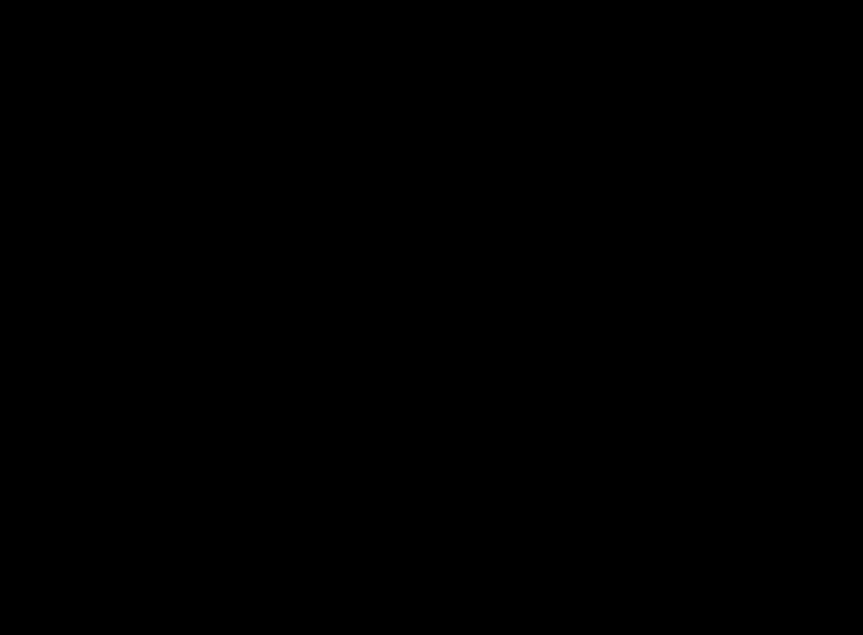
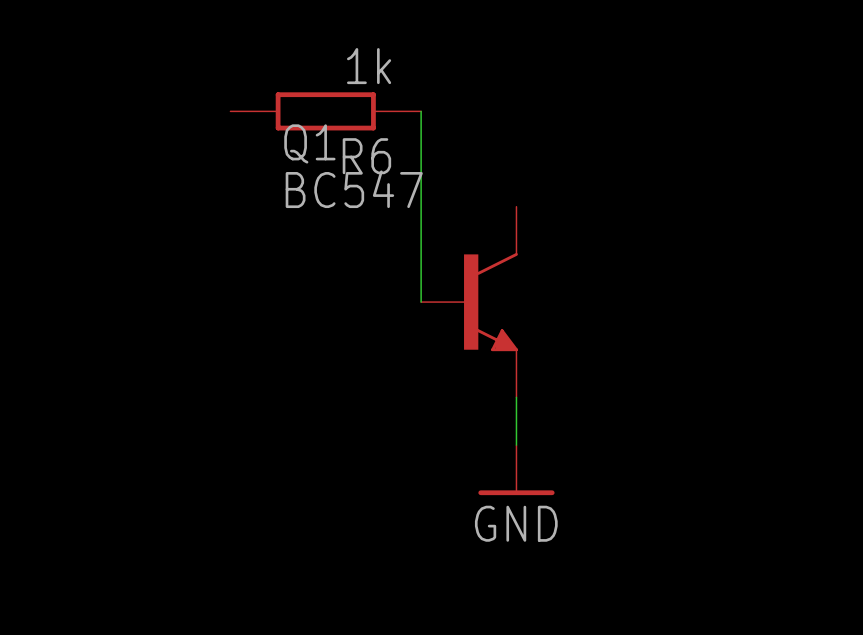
R6: none -> 1k (325, 111)
wire: none -> (421, 111) (421, 302)
Q1: none -> BC547 (469, 302)
wire: none -> (516, 397) (516, 445)
power symbol: none -> GND (516, 470)

